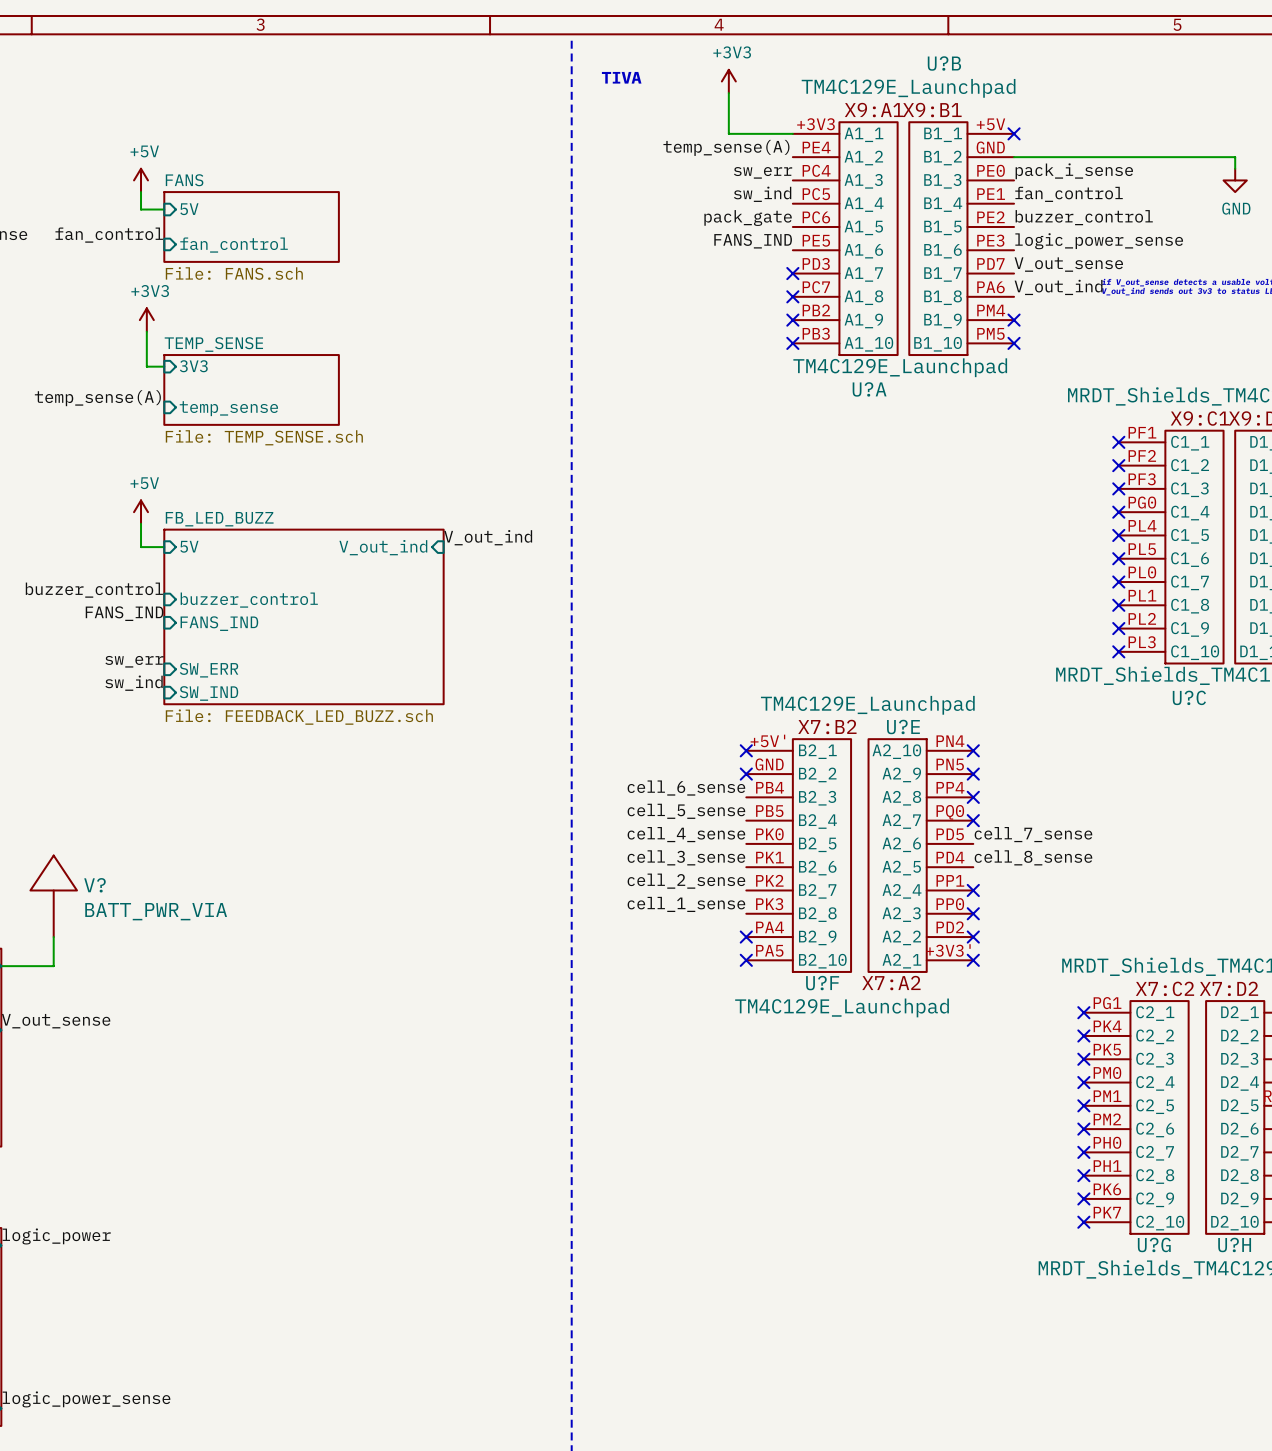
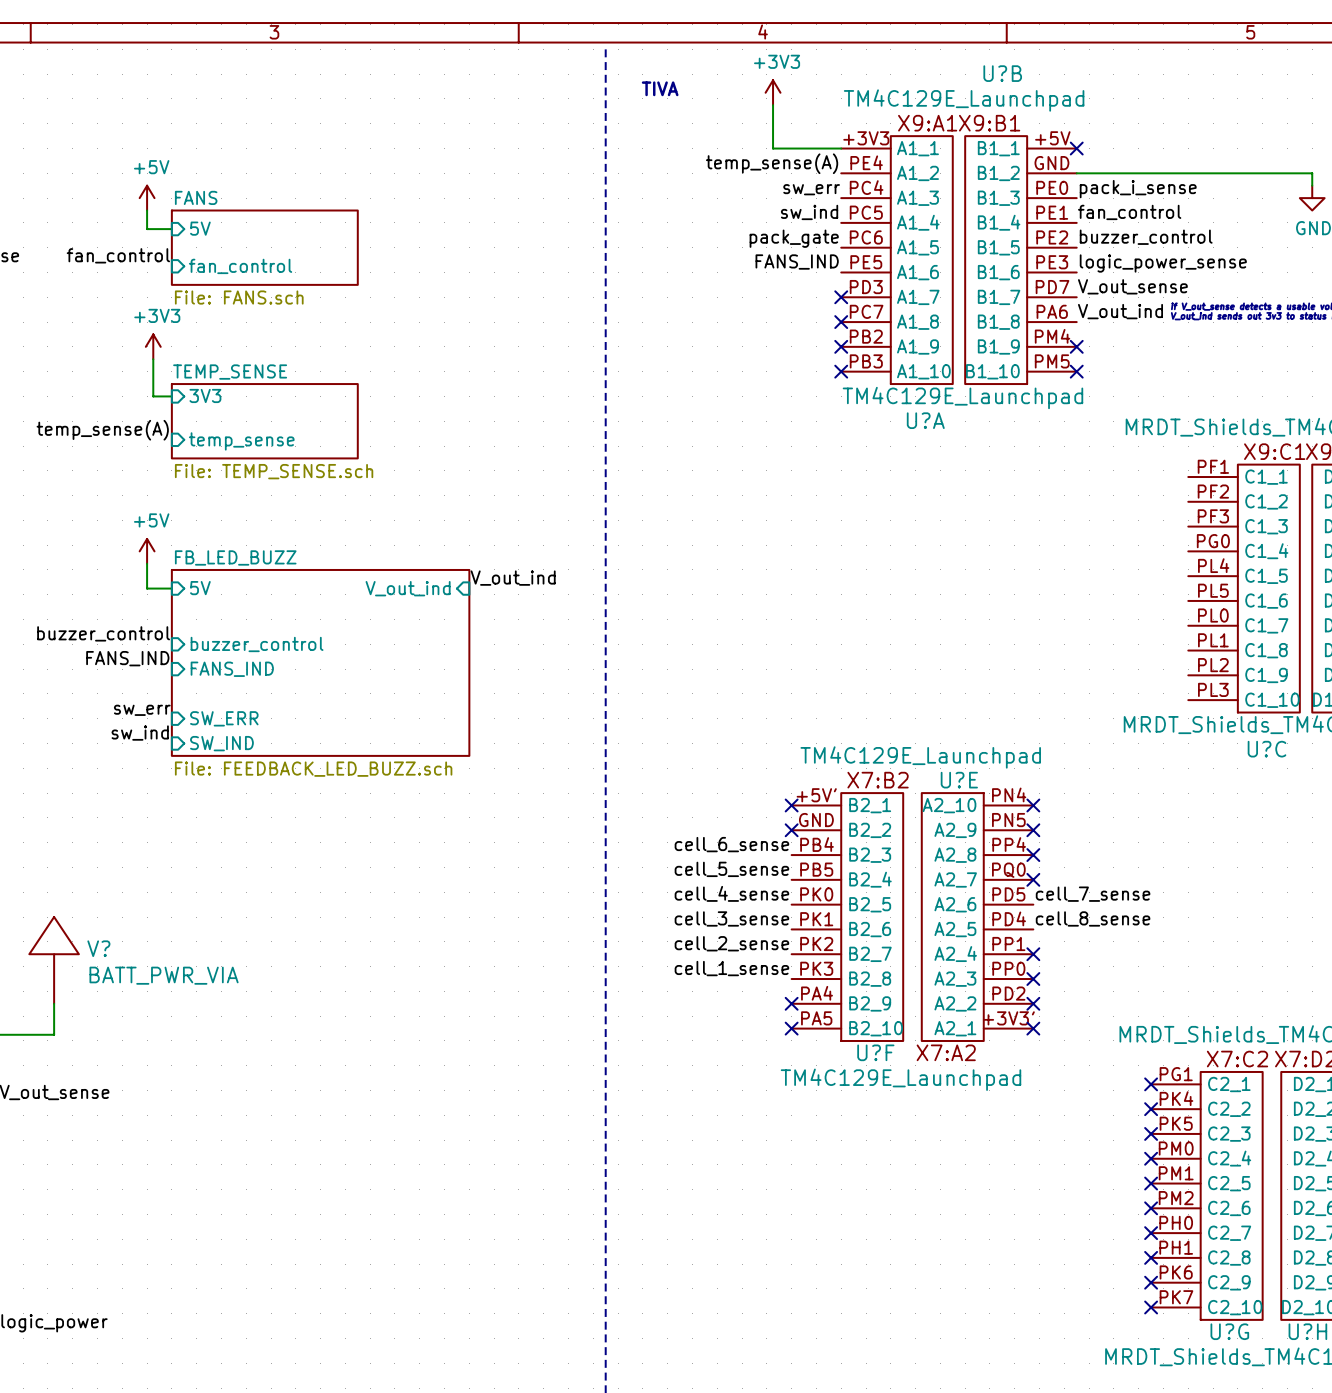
no-connect mark: (1118, 442) -> none
no-connect mark: (1118, 465) -> none
no-connect mark: (1118, 488) -> none
no-connect mark: (1118, 512) -> none
no-connect mark: (1118, 535) -> none
no-connect mark: (1118, 558) -> none
no-connect mark: (1118, 582) -> none
no-connect mark: (1118, 605) -> none
no-connect mark: (1118, 628) -> none
no-connect mark: (1118, 651) -> none

